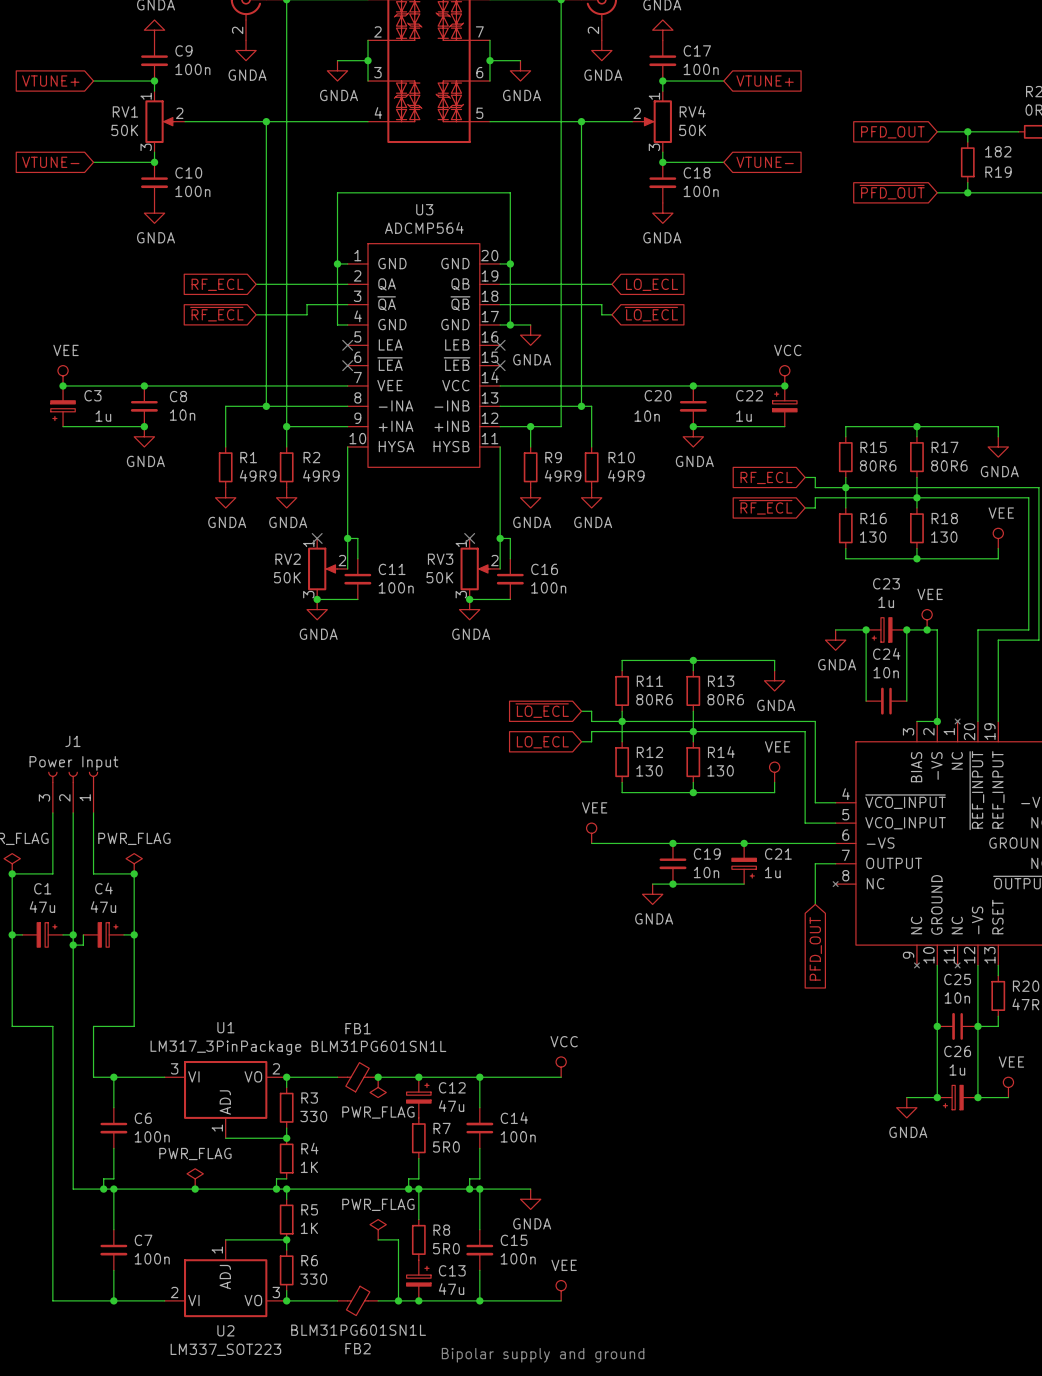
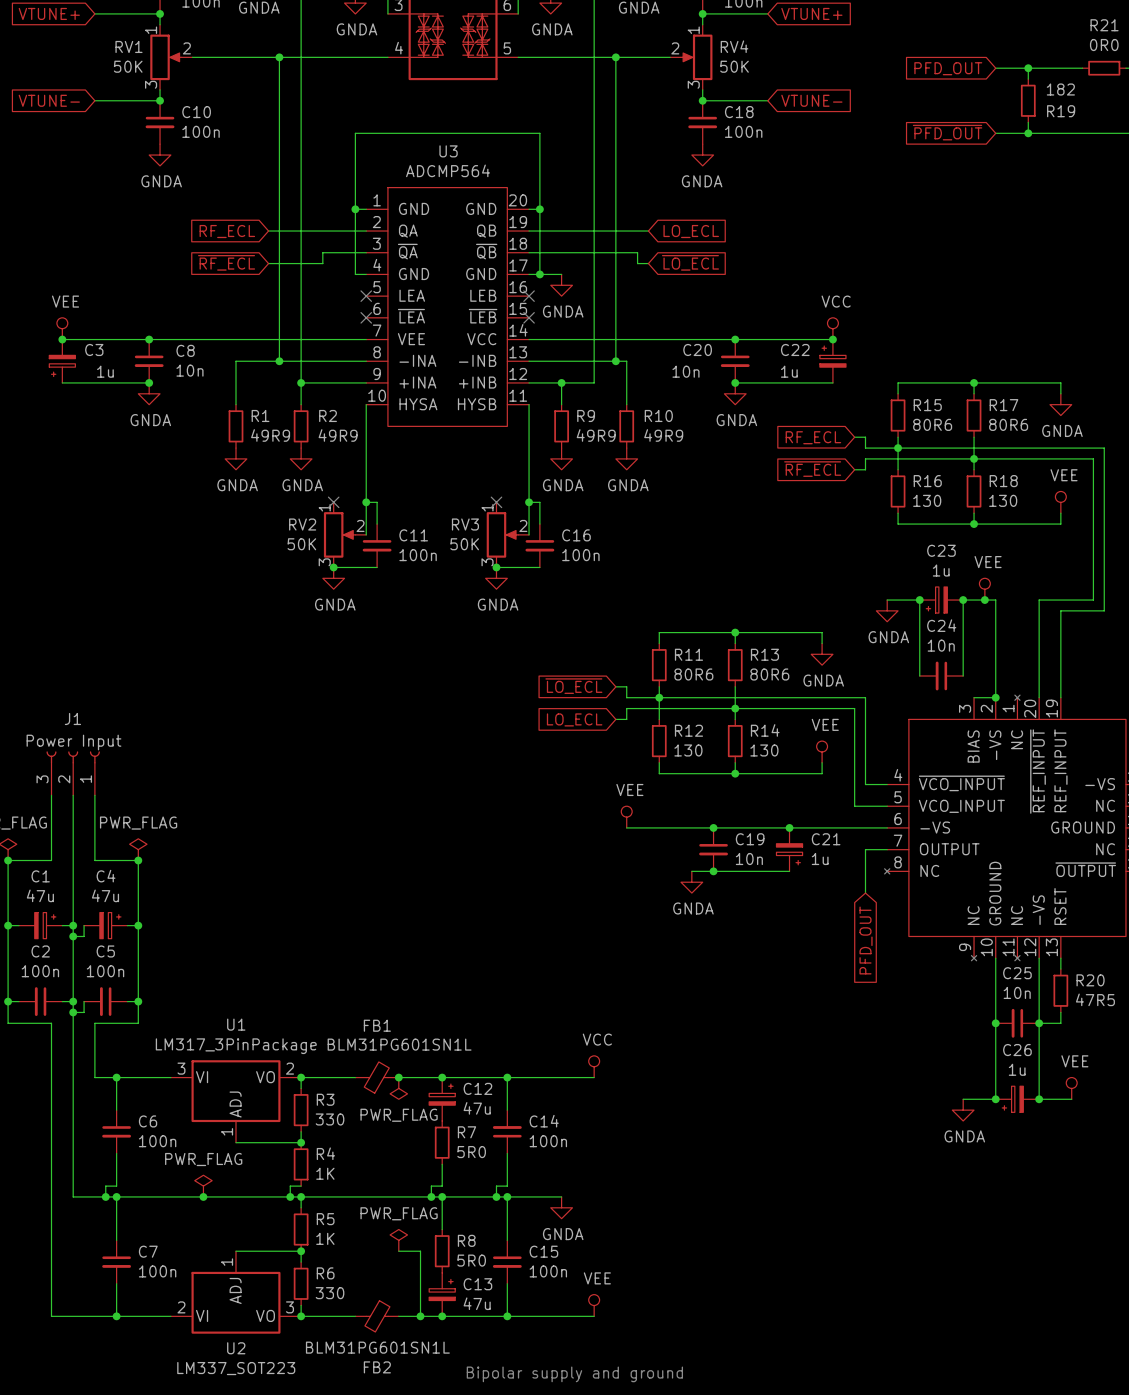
wire: none -> (8, 1001) (18, 1001)
junction: none -> (8, 1001)
C2: none -> 100n (40, 1001)
wire: none -> (62, 1001) (73, 1001)
junction: none -> (73, 1001)
wire: none -> (84, 1001) (84, 1012) (73, 1012)
C5: none -> 100n (105, 1001)
wire: none -> (127, 1001) (138, 1001)
junction: none -> (138, 1001)
junction: none -> (73, 1012)

